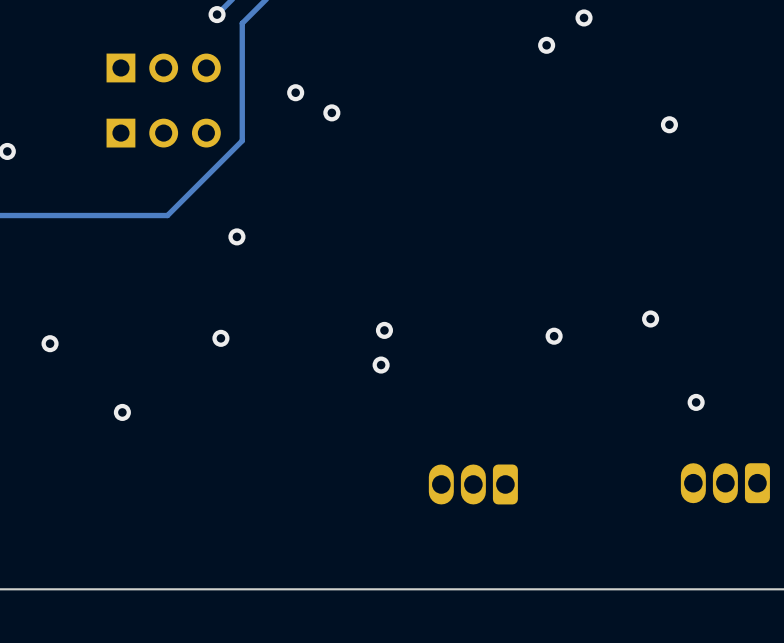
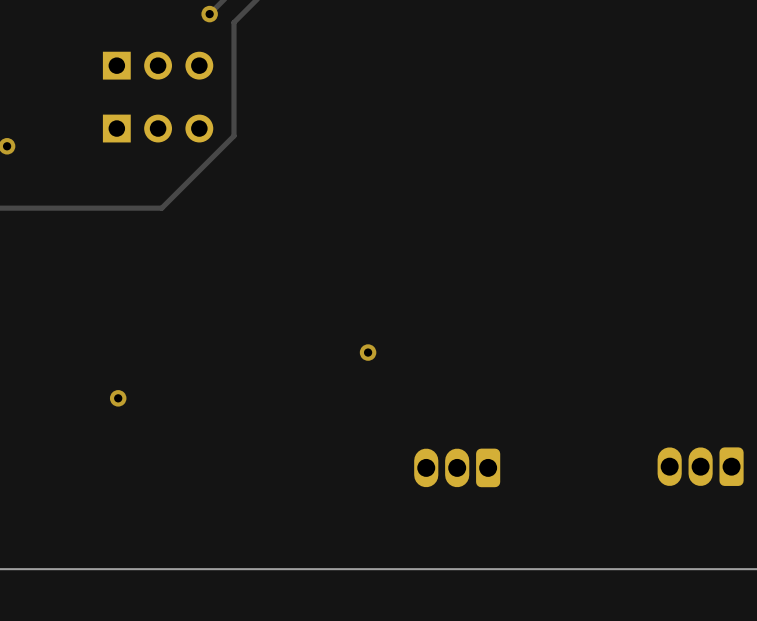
via: (584, 17) -> none
via: (546, 45) -> none
via: (295, 92) -> none
via: (331, 112) -> none
via: (669, 124) -> none
via: (236, 236) -> none
via: (650, 318) -> none
via: (384, 330) -> none
via: (554, 336) -> none
via: (220, 338) -> none
via: (50, 343) -> none
via: (696, 402) -> none

